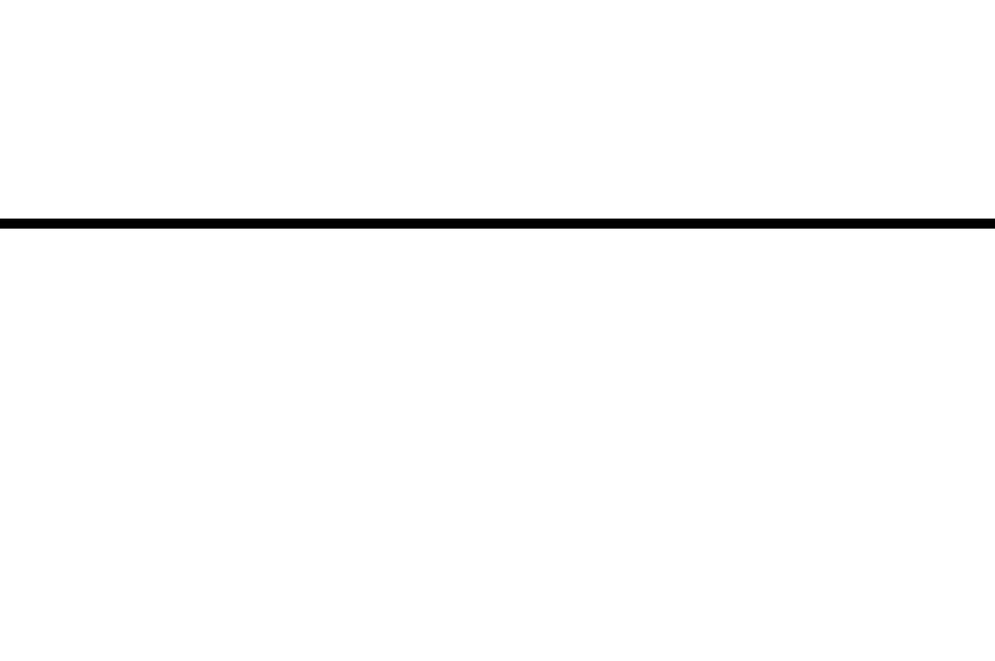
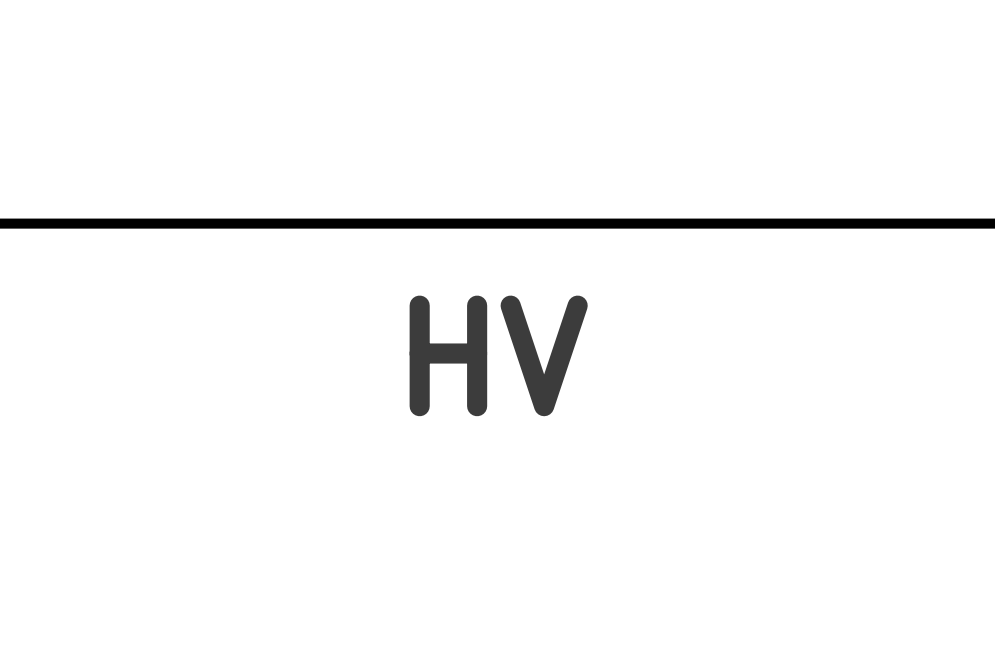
text: none -> HV (498, 355)

